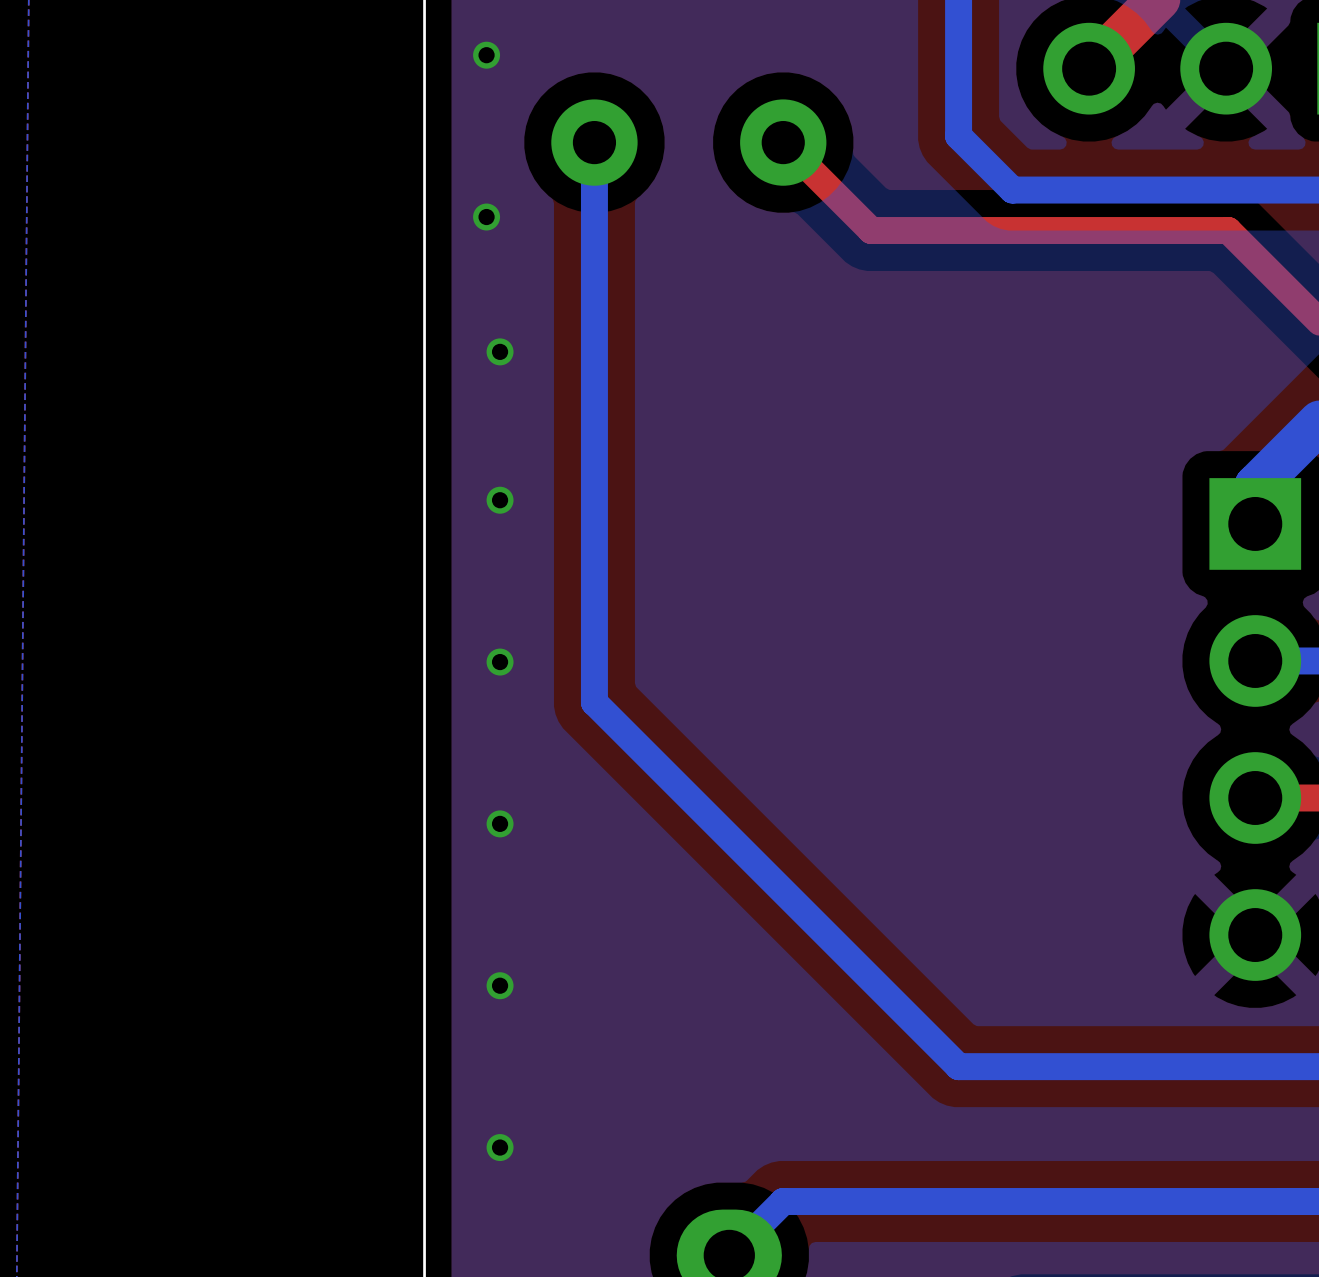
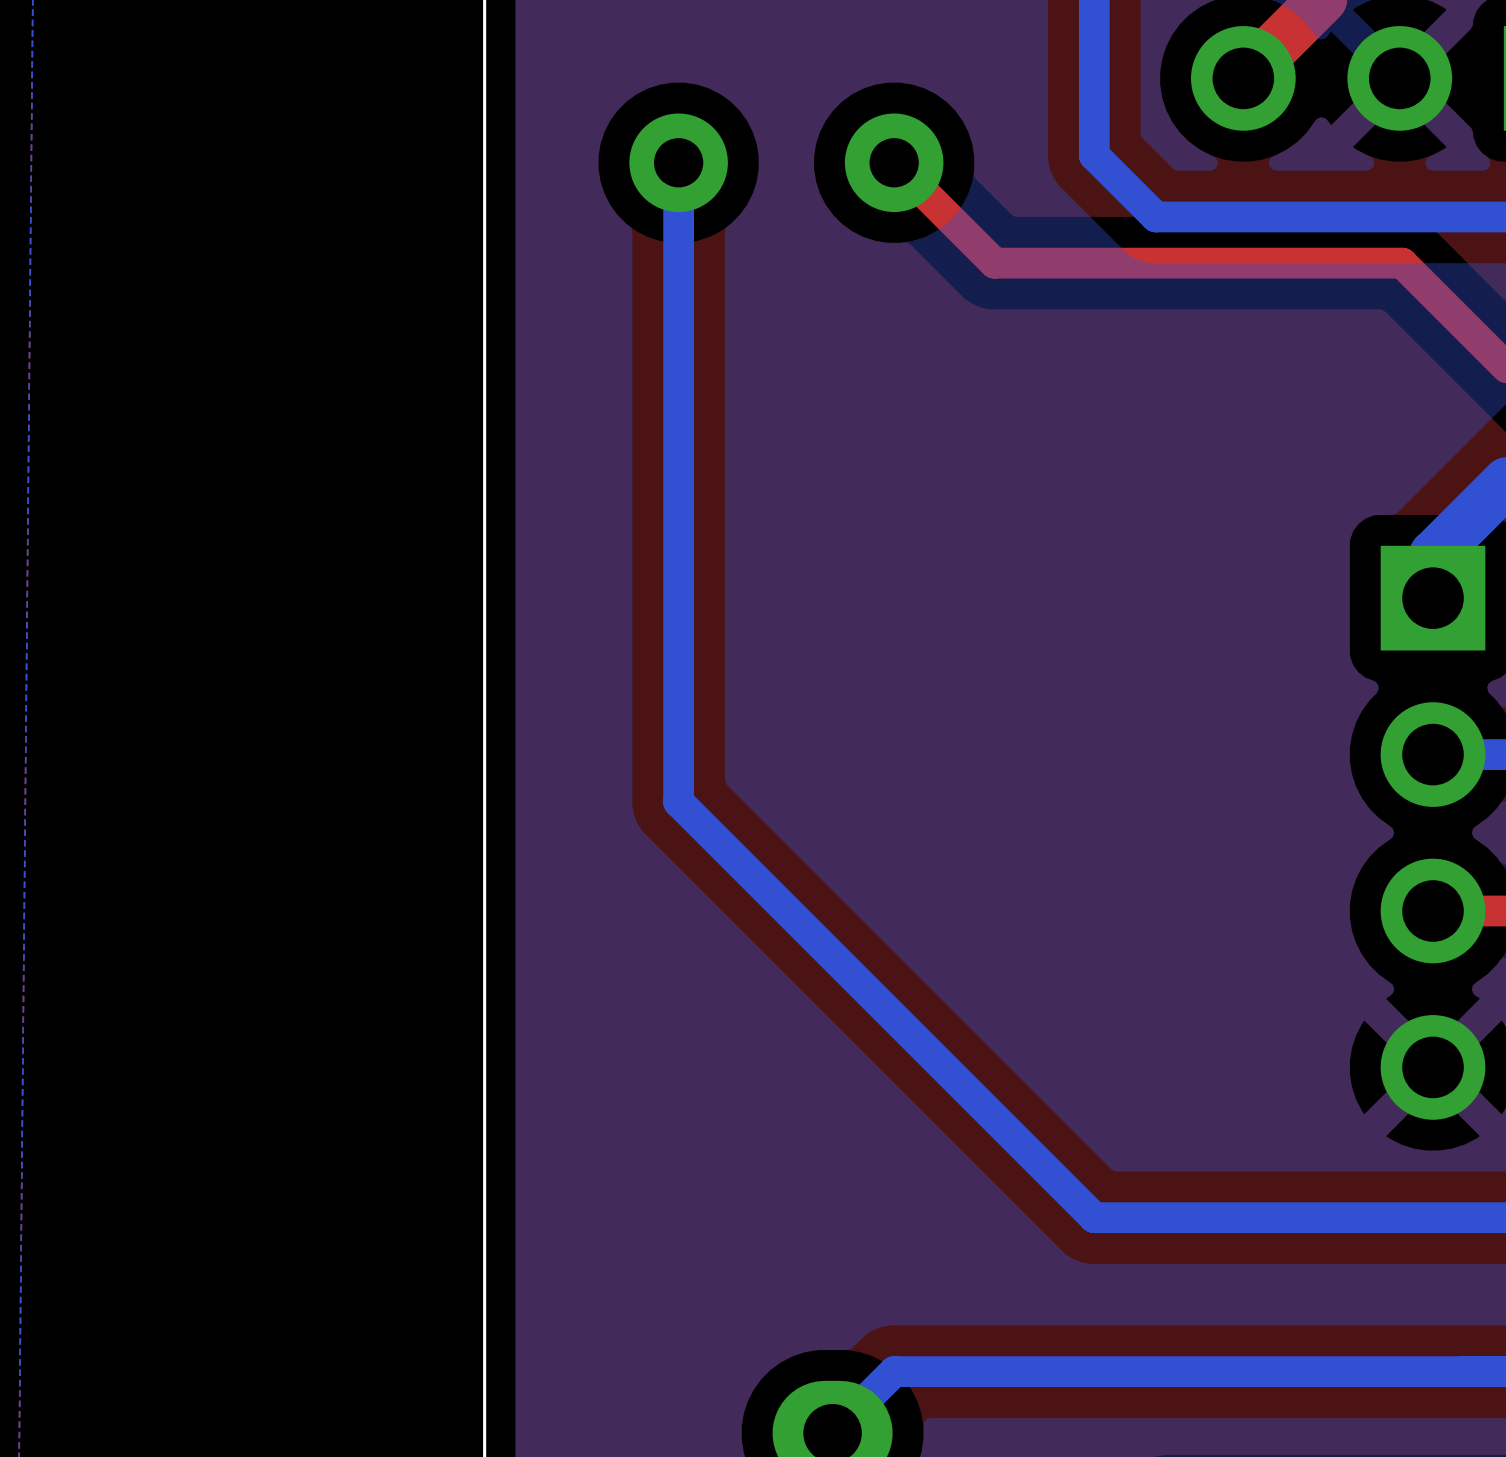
via: (486, 55) -> none
via: (486, 217) -> none
via: (500, 351) -> none
via: (500, 500) -> none
via: (500, 662) -> none
via: (500, 823) -> none
via: (500, 985) -> none
via: (500, 1147) -> none

